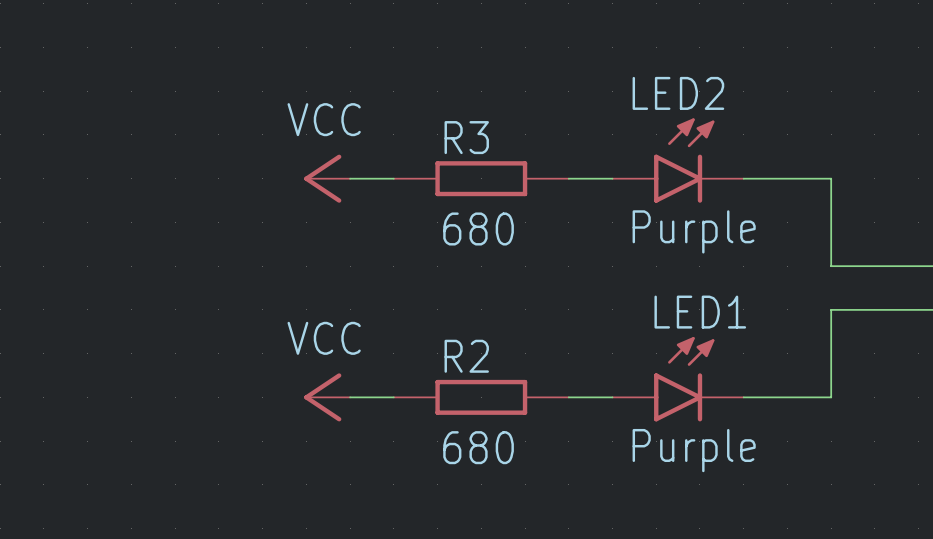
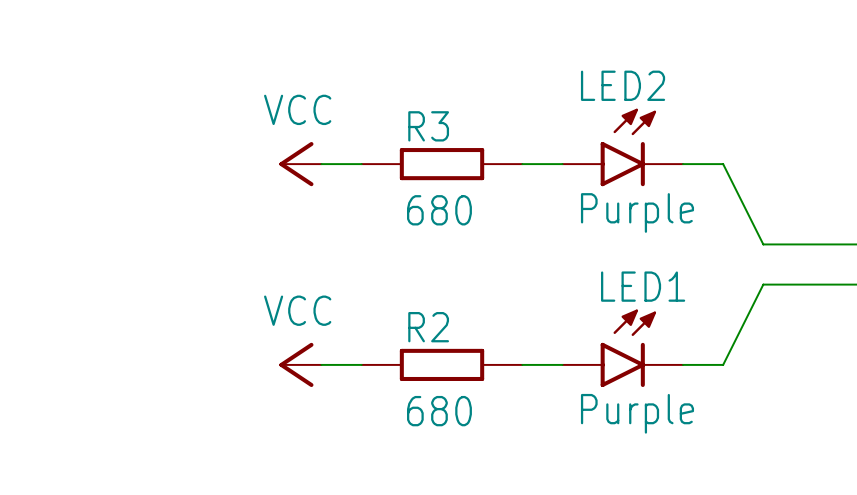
wire: (787, 178) (831, 178) (831, 266) -> (723, 164) (763, 244)
wire: (831, 309) (831, 397) (787, 397) -> (763, 284) (723, 364)

